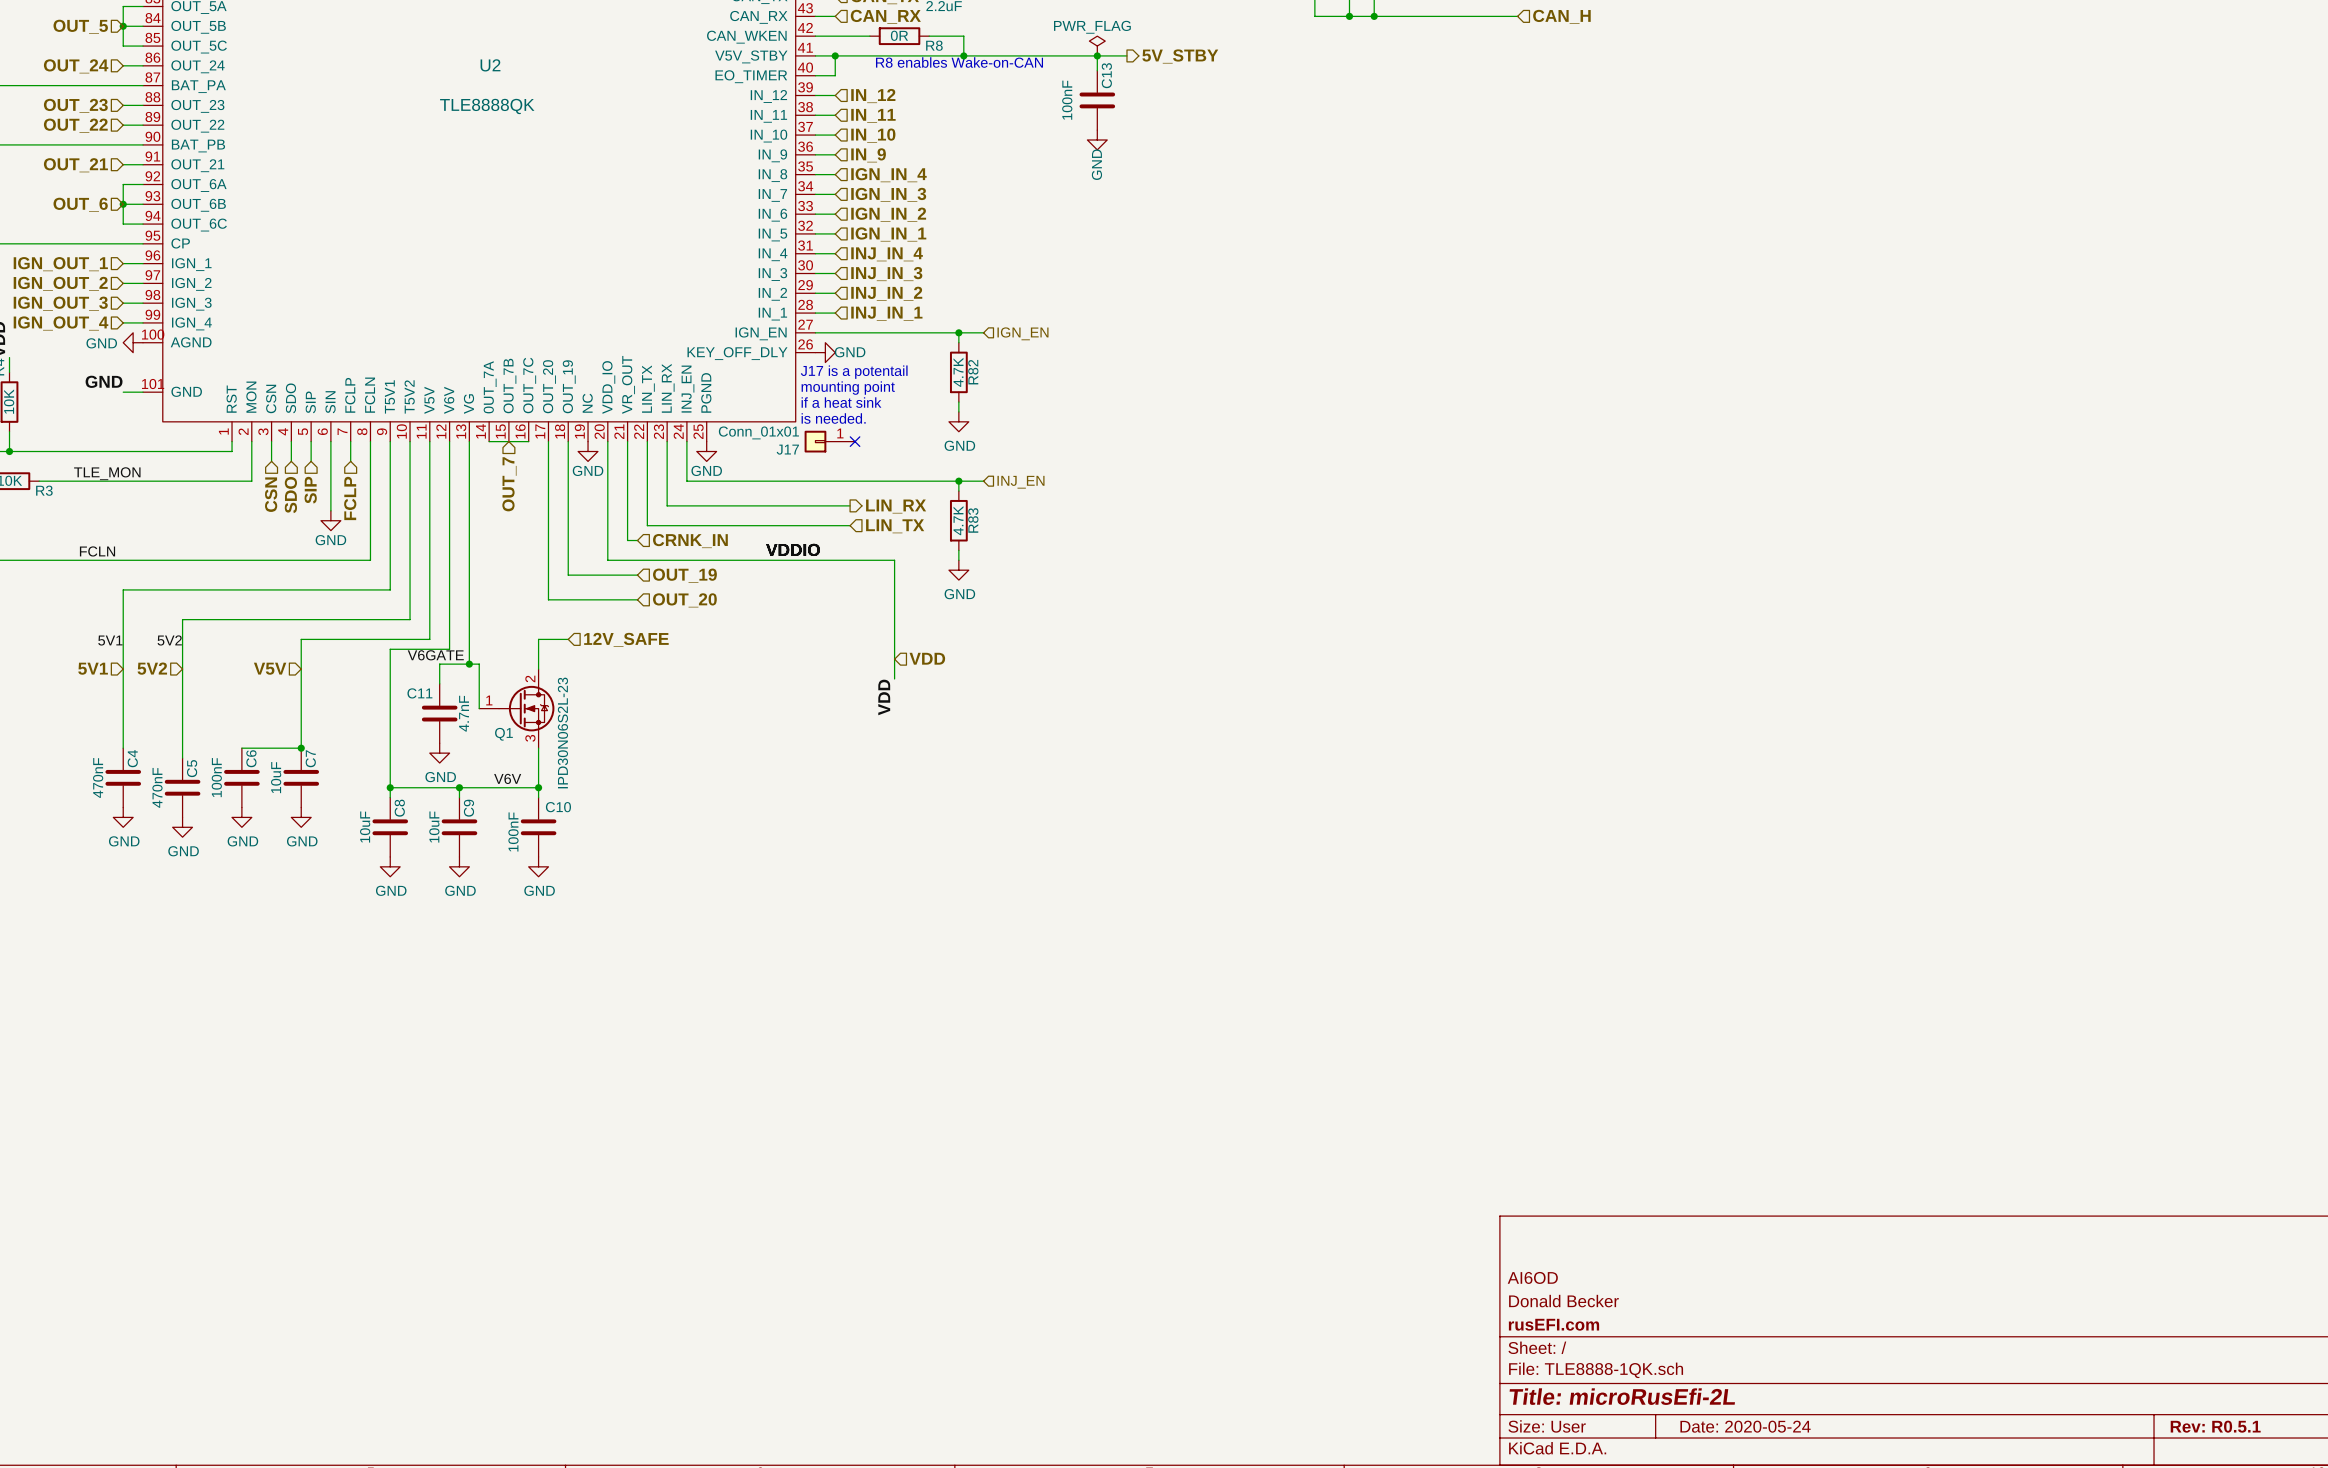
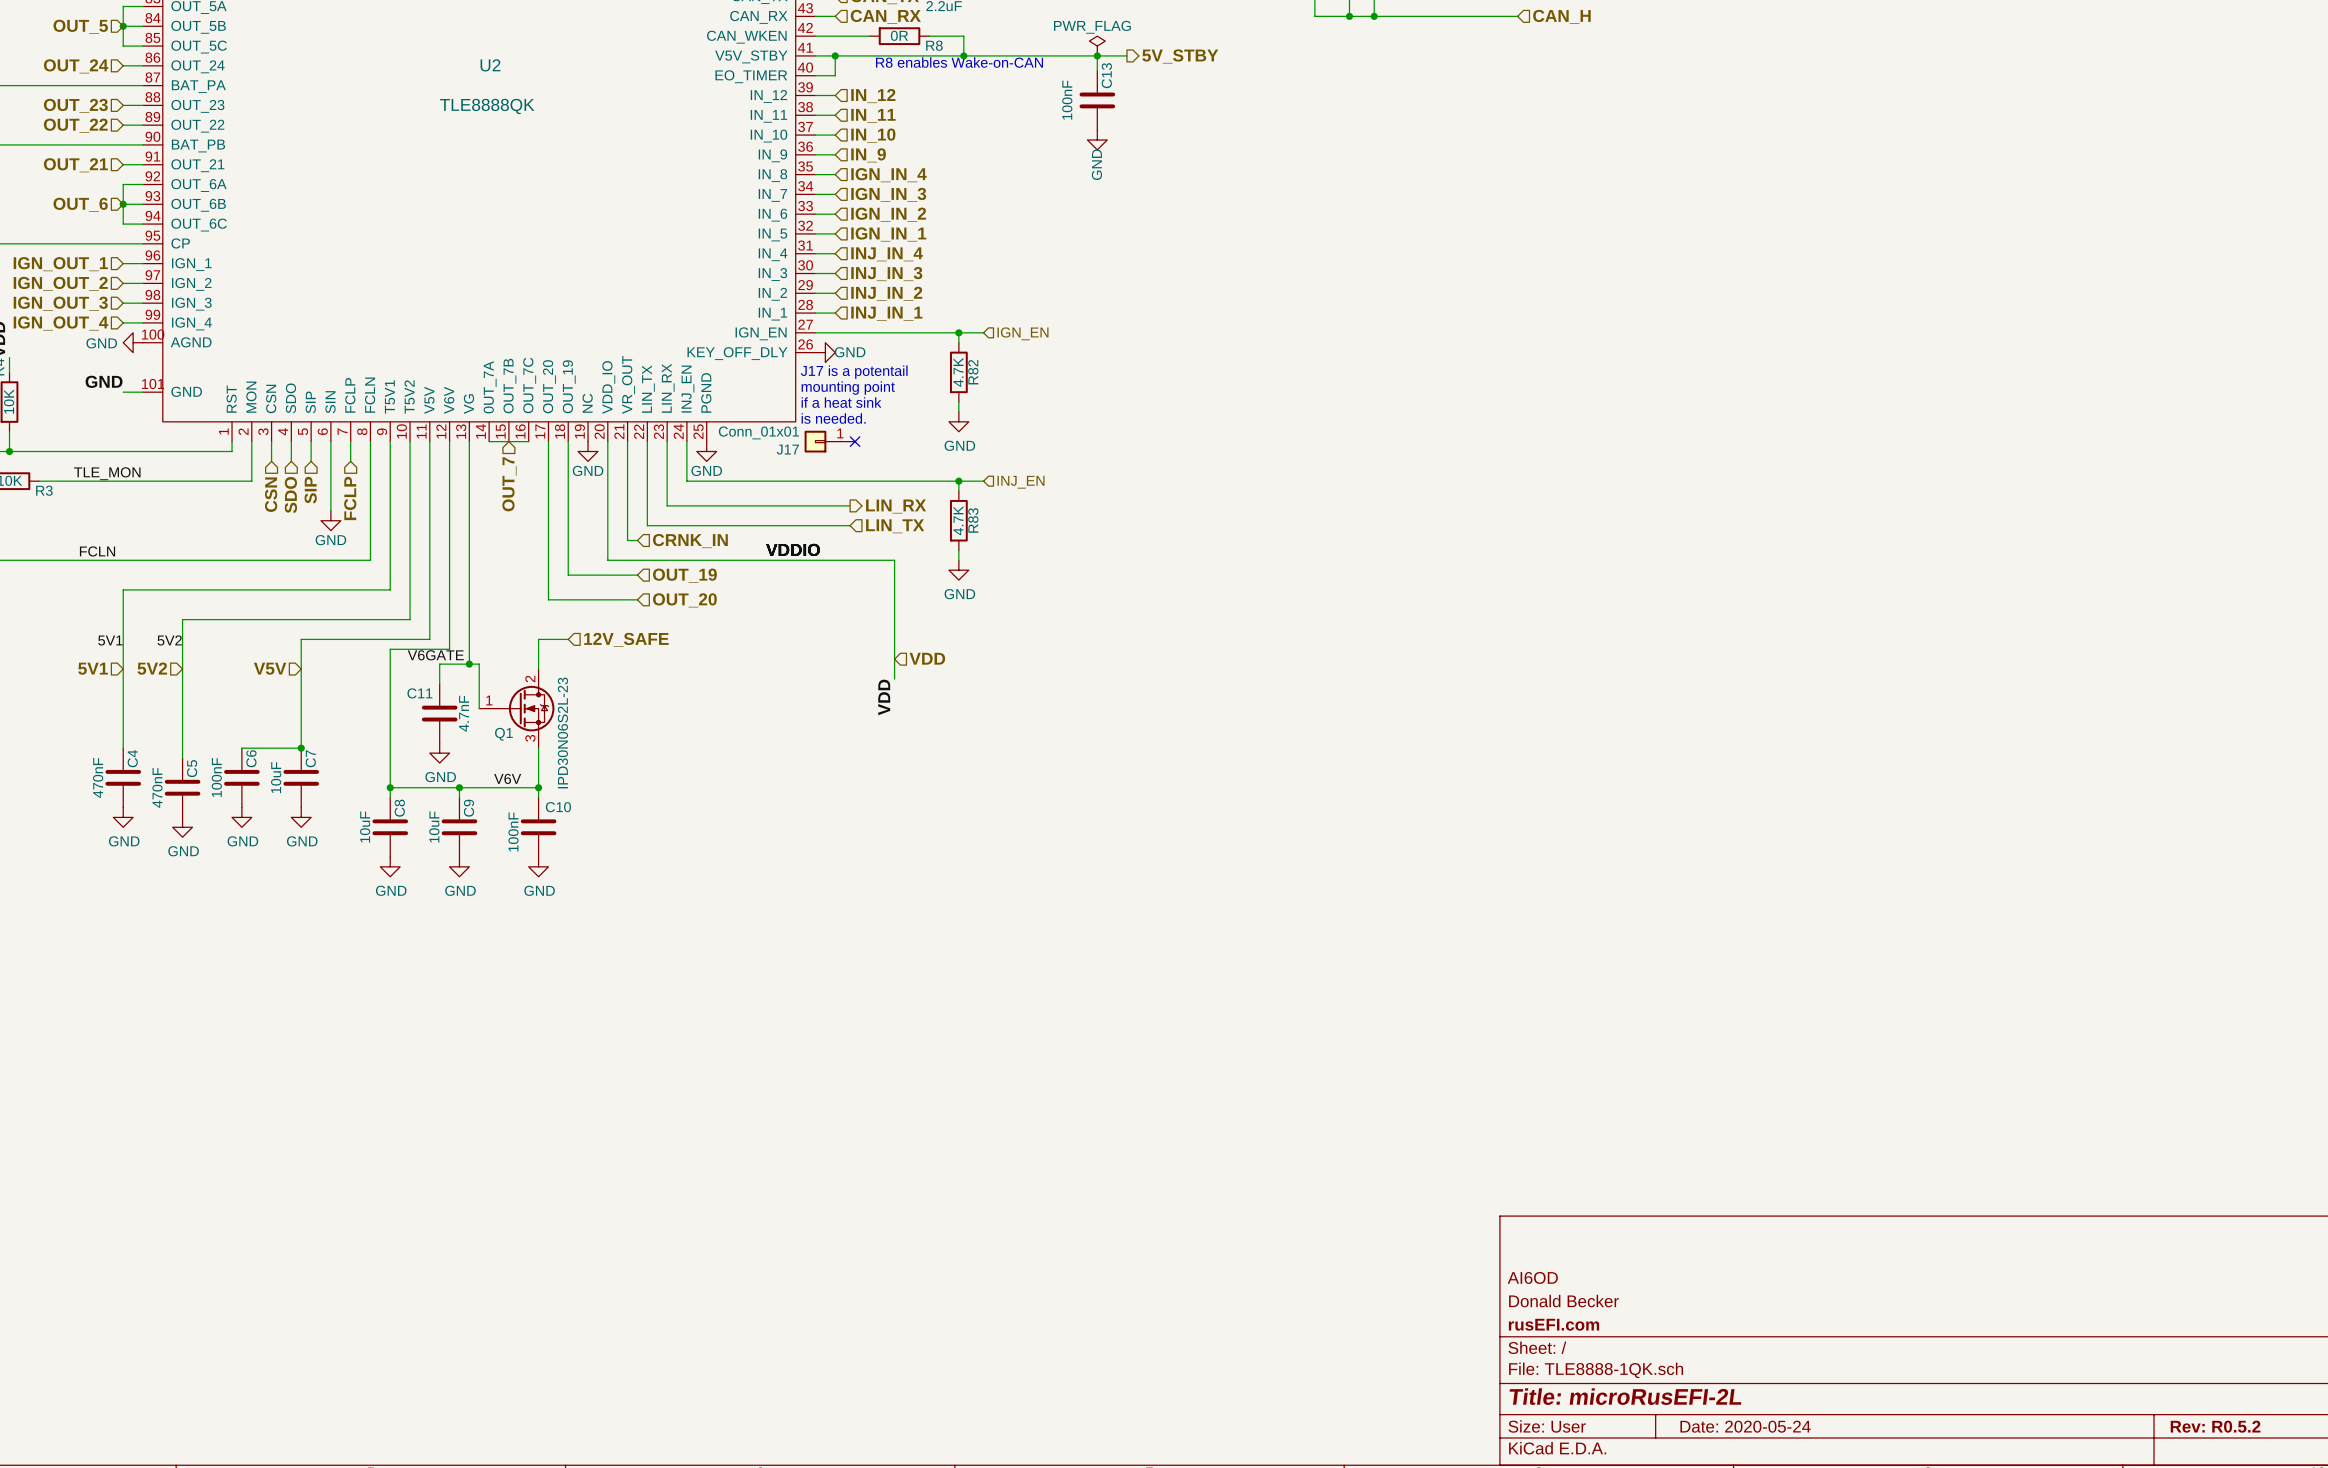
title block: Title: microRusEfi-2L (1622, 1396) -> Title: microRusEFI-2L (1625, 1396)
title block: Rev: R0.5.1 (2215, 1426) -> Rev: R0.5.2 (2215, 1426)

